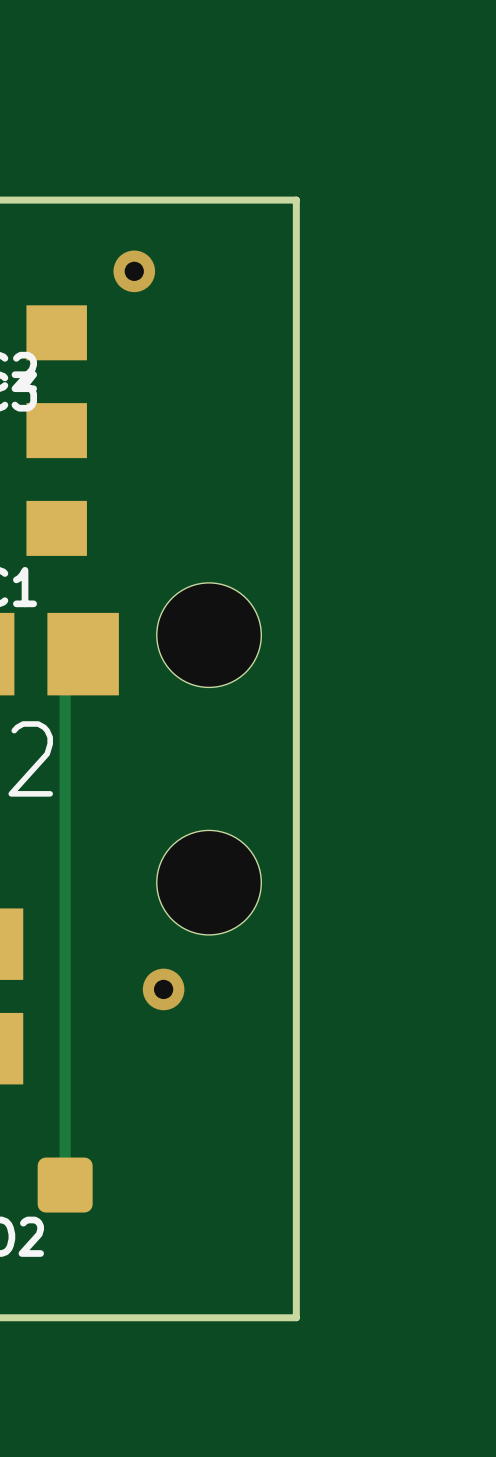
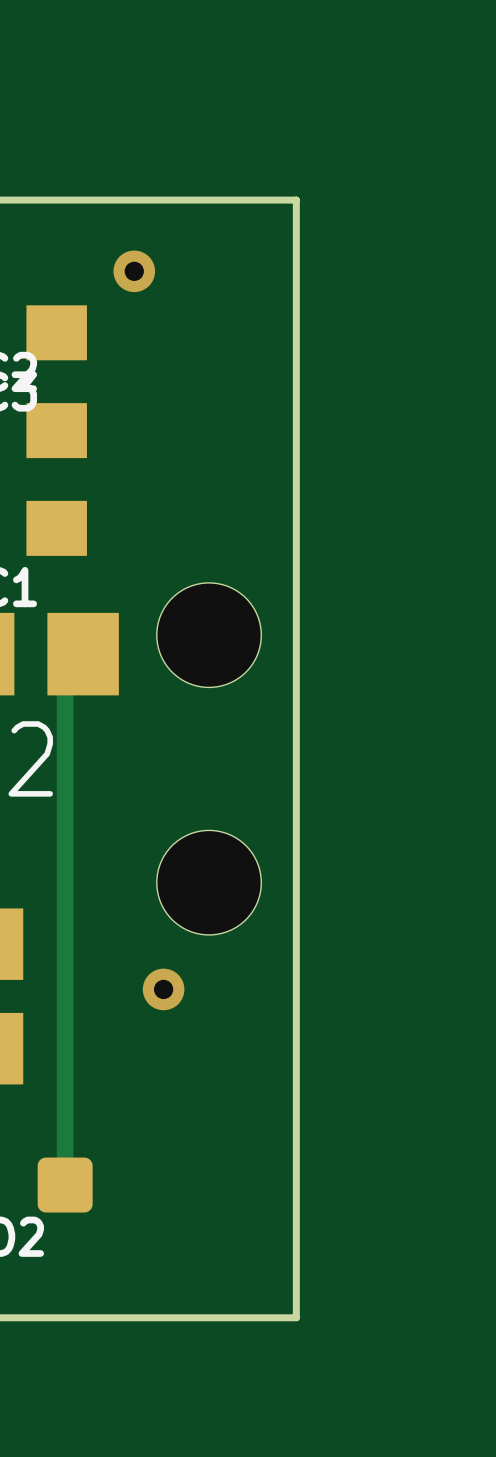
track width: thin (83, 654) (65, 672) (65, 1185) -> thick (83, 654) (65, 672) (65, 1185)

